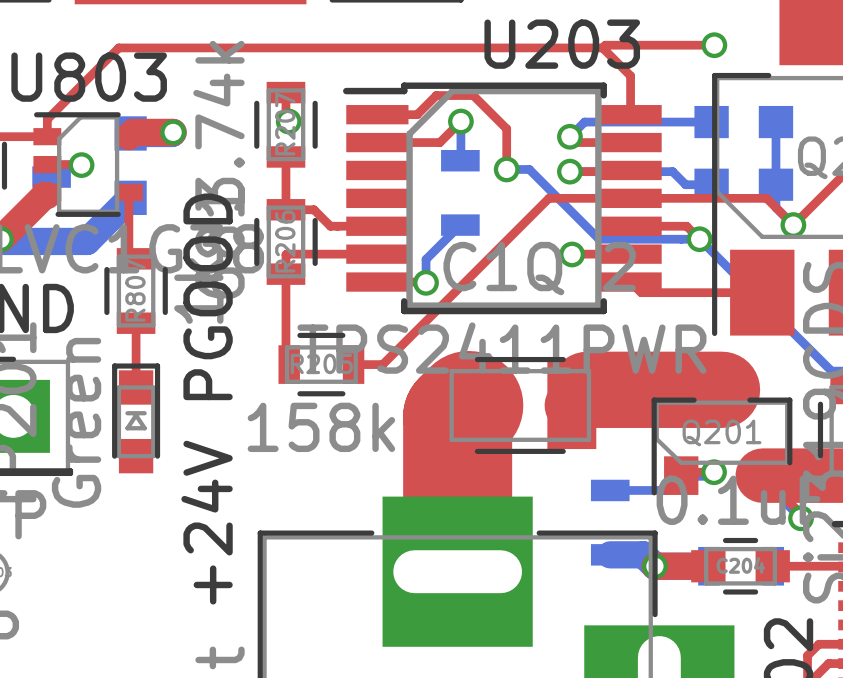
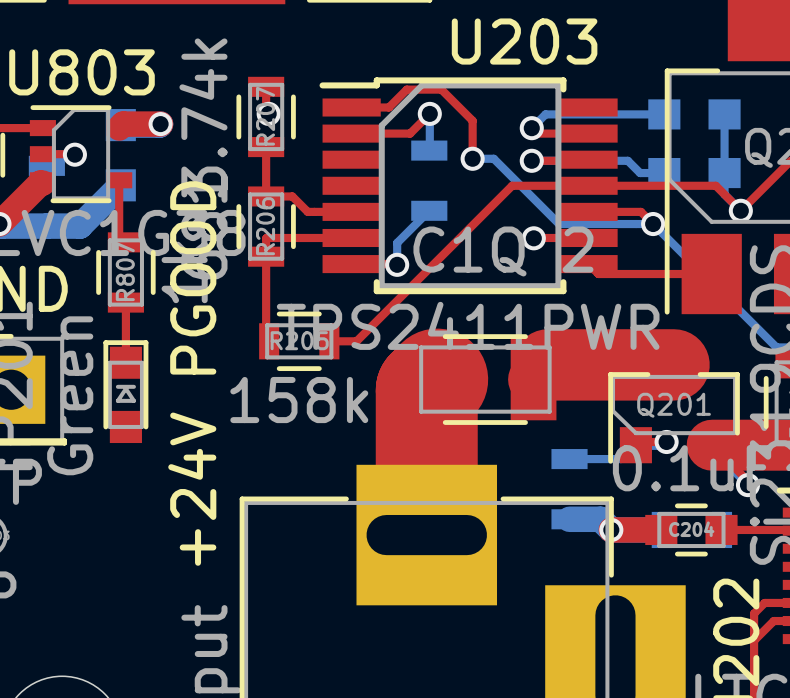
top track: (714, 45) (605, 45) (602, 47) -> none
via: (714, 45) -> none
top track: (602, 47) (630, 75) (630, 114) -> none
top track: (602, 47) (118, 47) (47, 119) (47, 136) -> none

